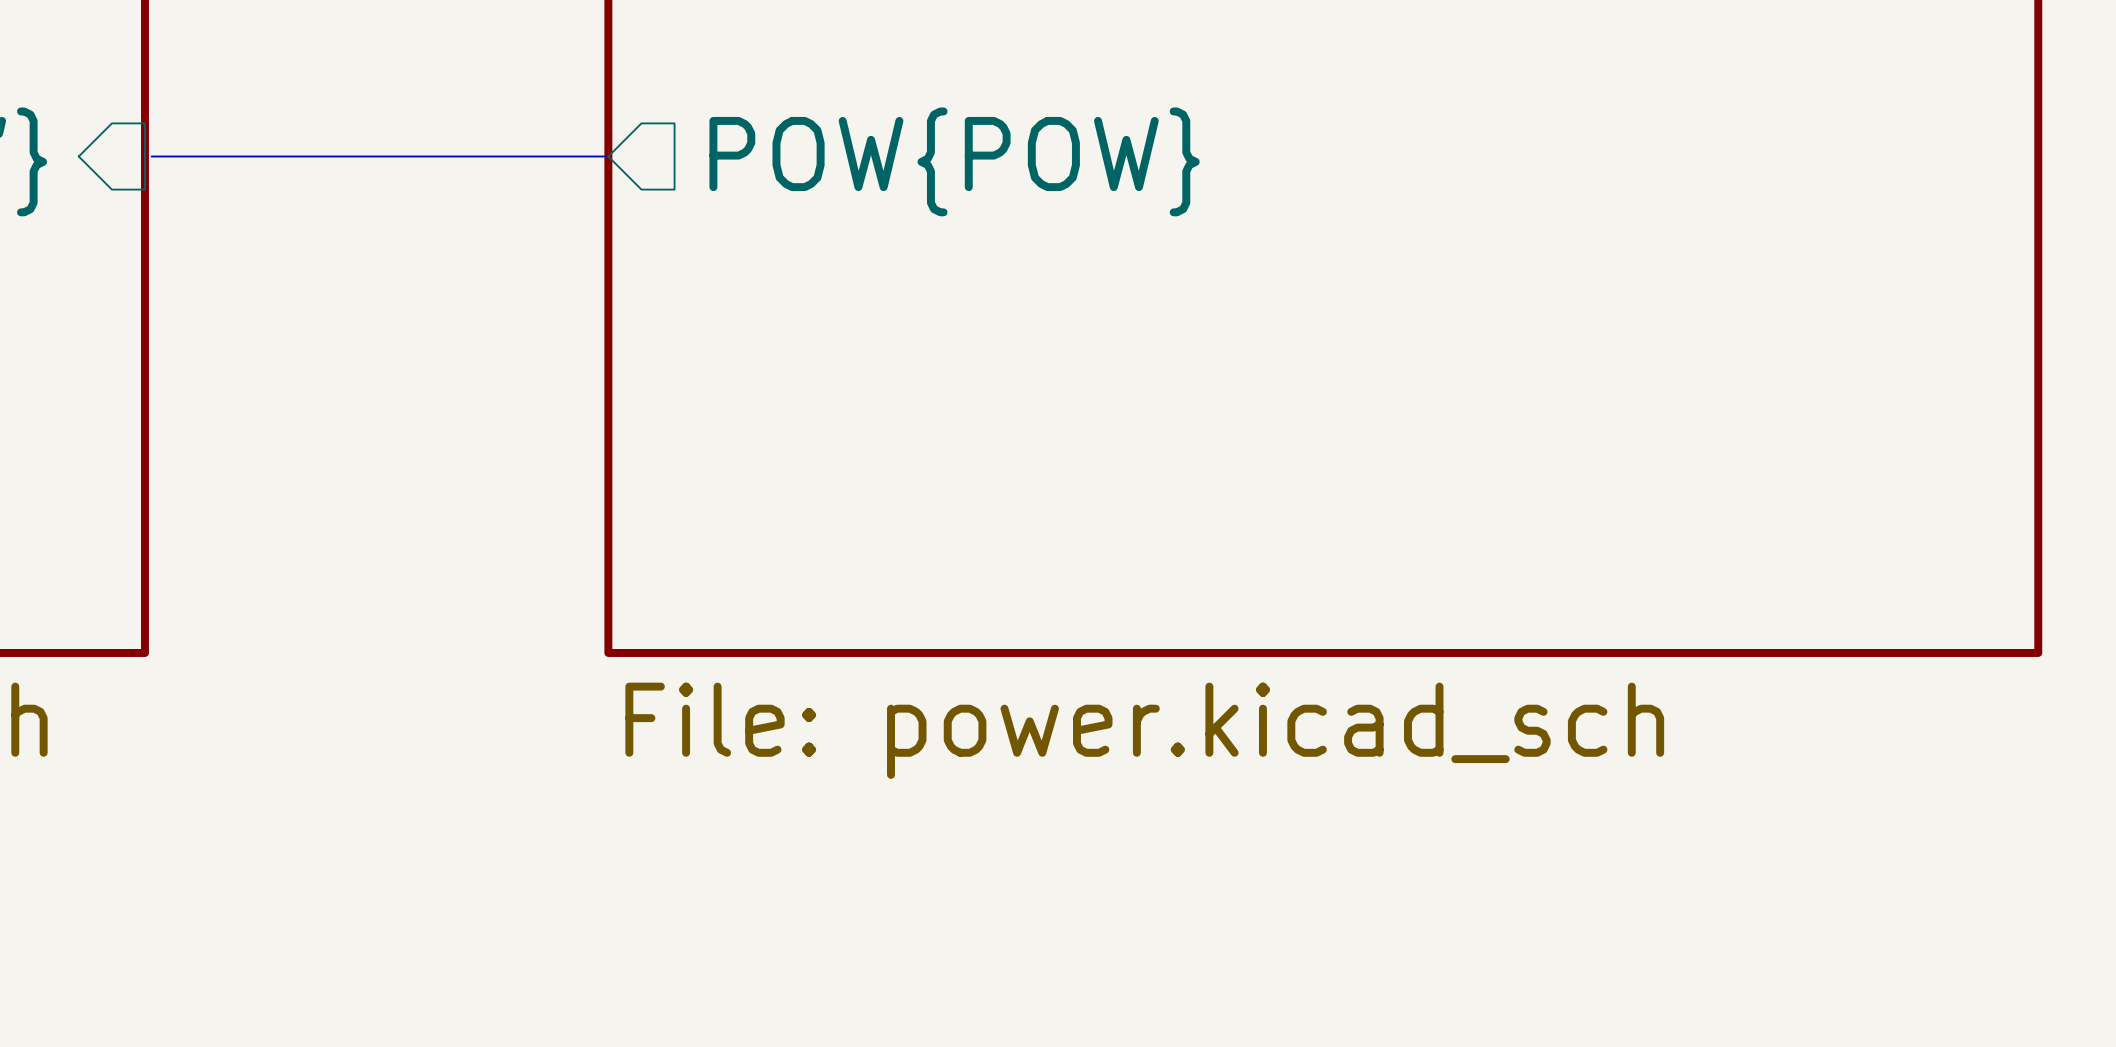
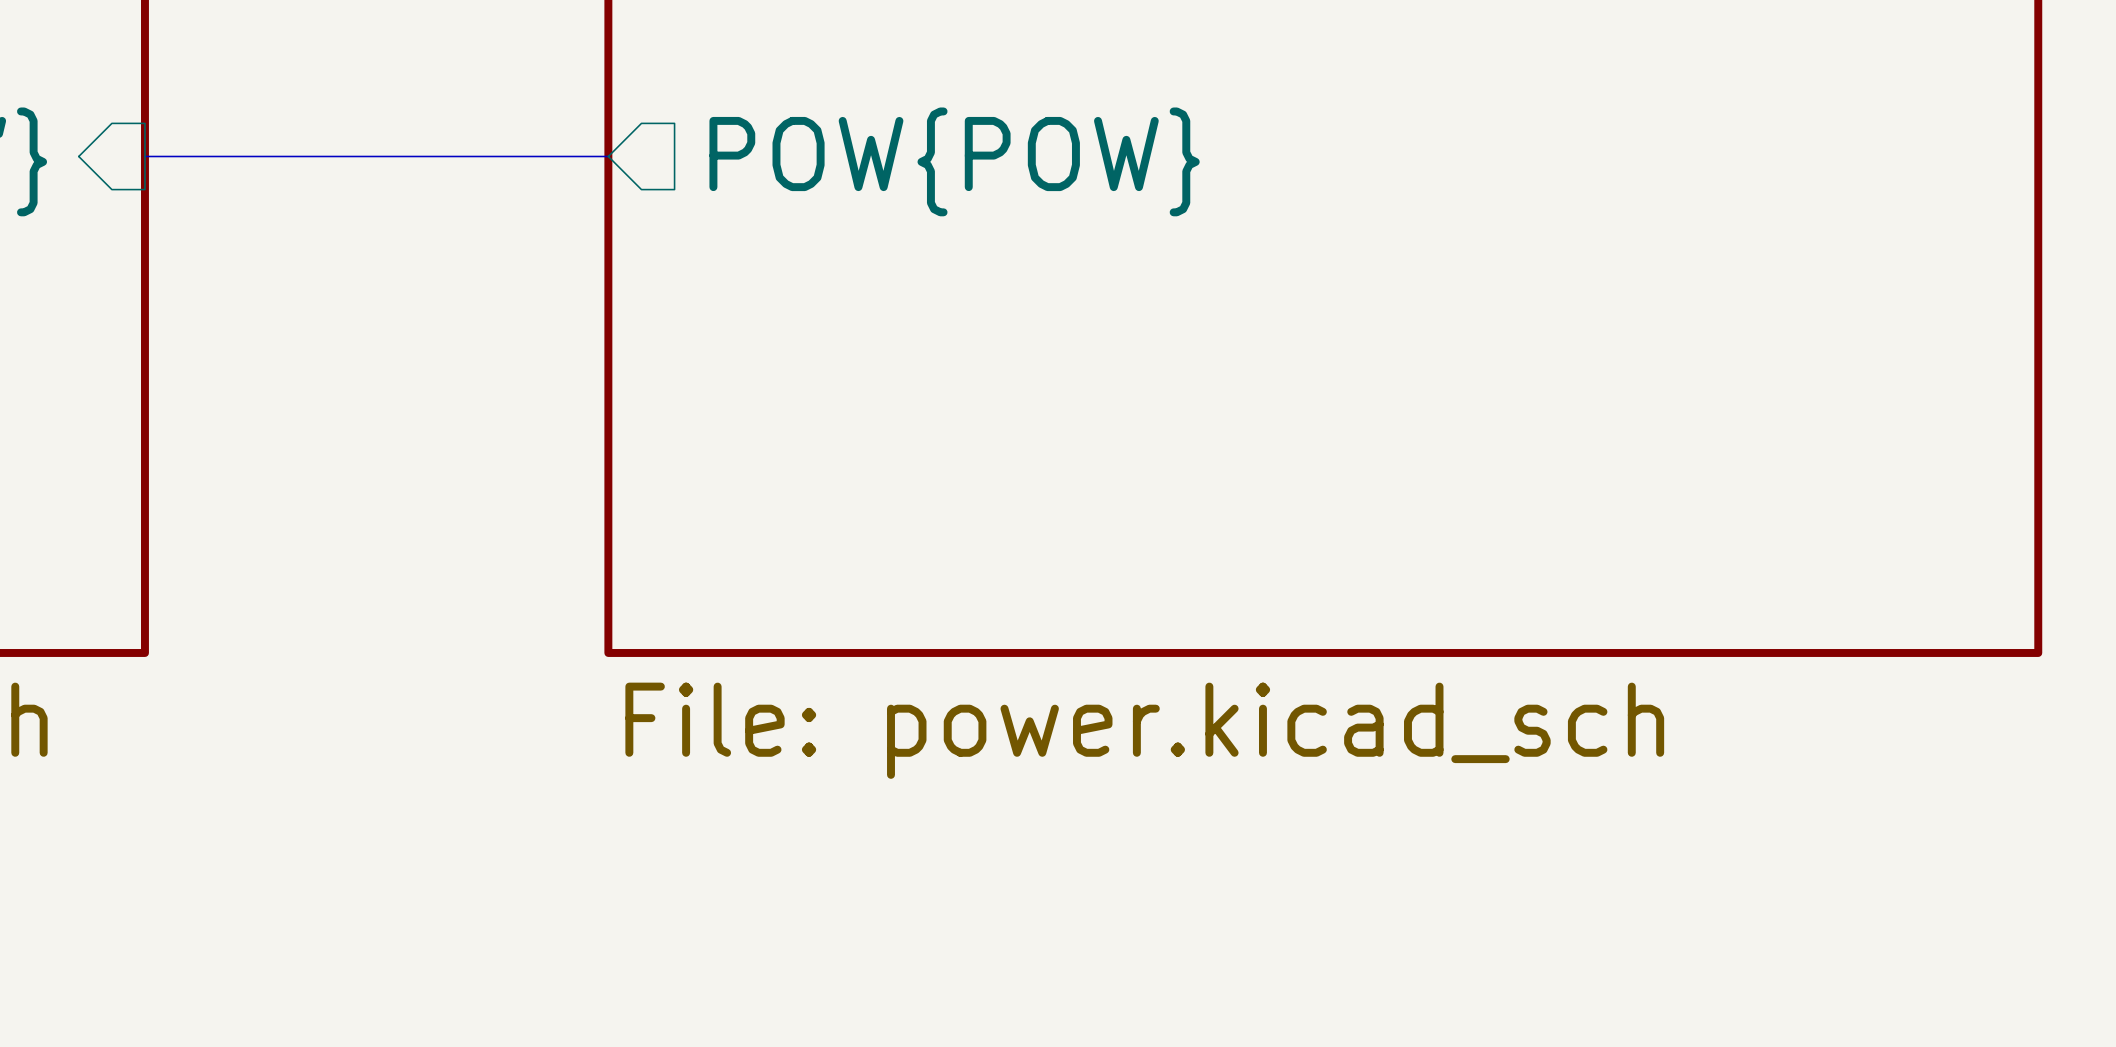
bus: none -> (144, 156) (151, 156)

